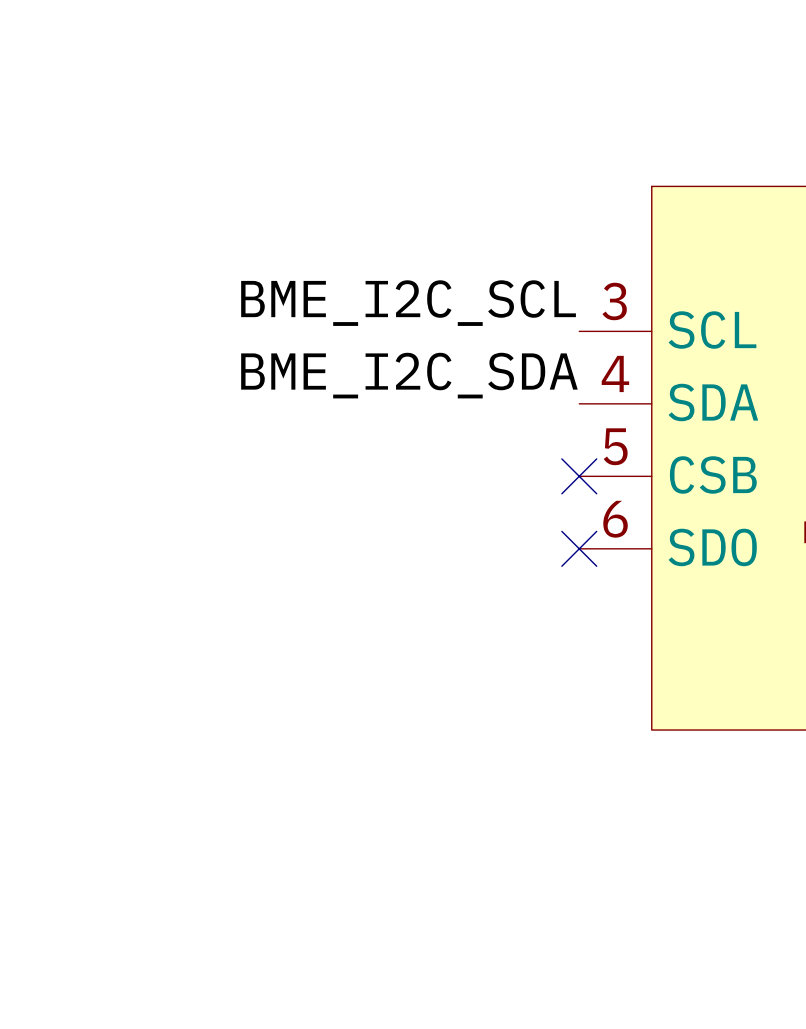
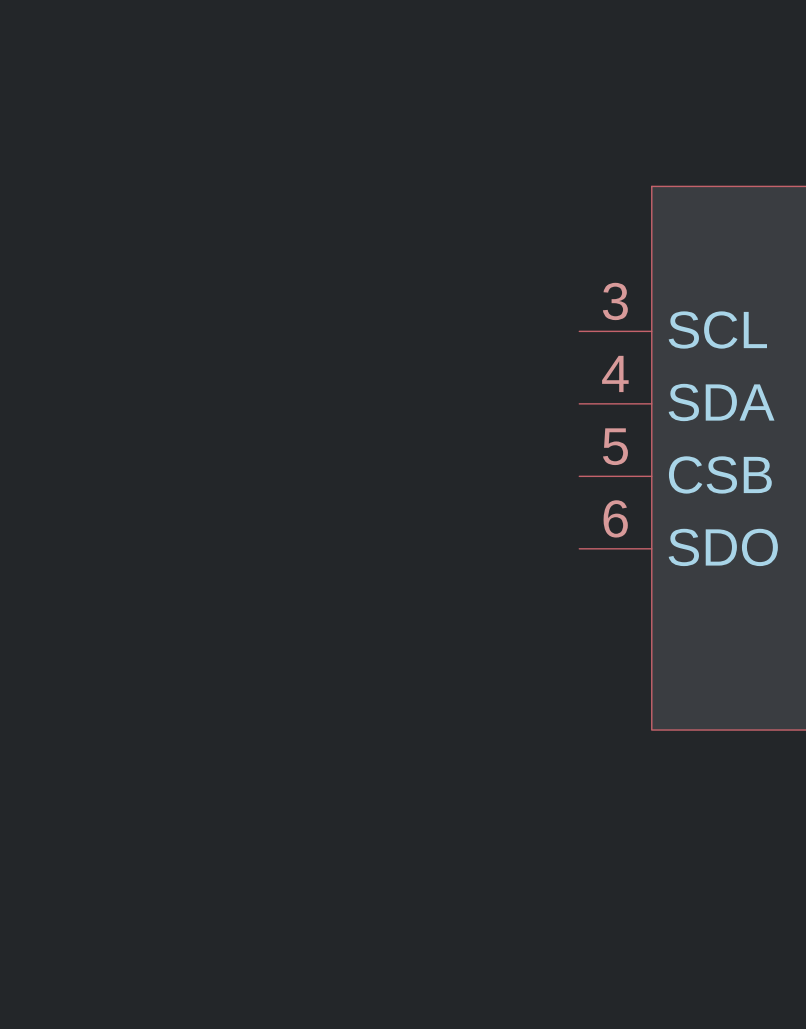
label: BME_I2C_SCL (408, 303) -> none
label: BME_I2C_SDA (409, 375) -> none
no-connect mark: (579, 476) -> none
no-connect mark: (579, 548) -> none

